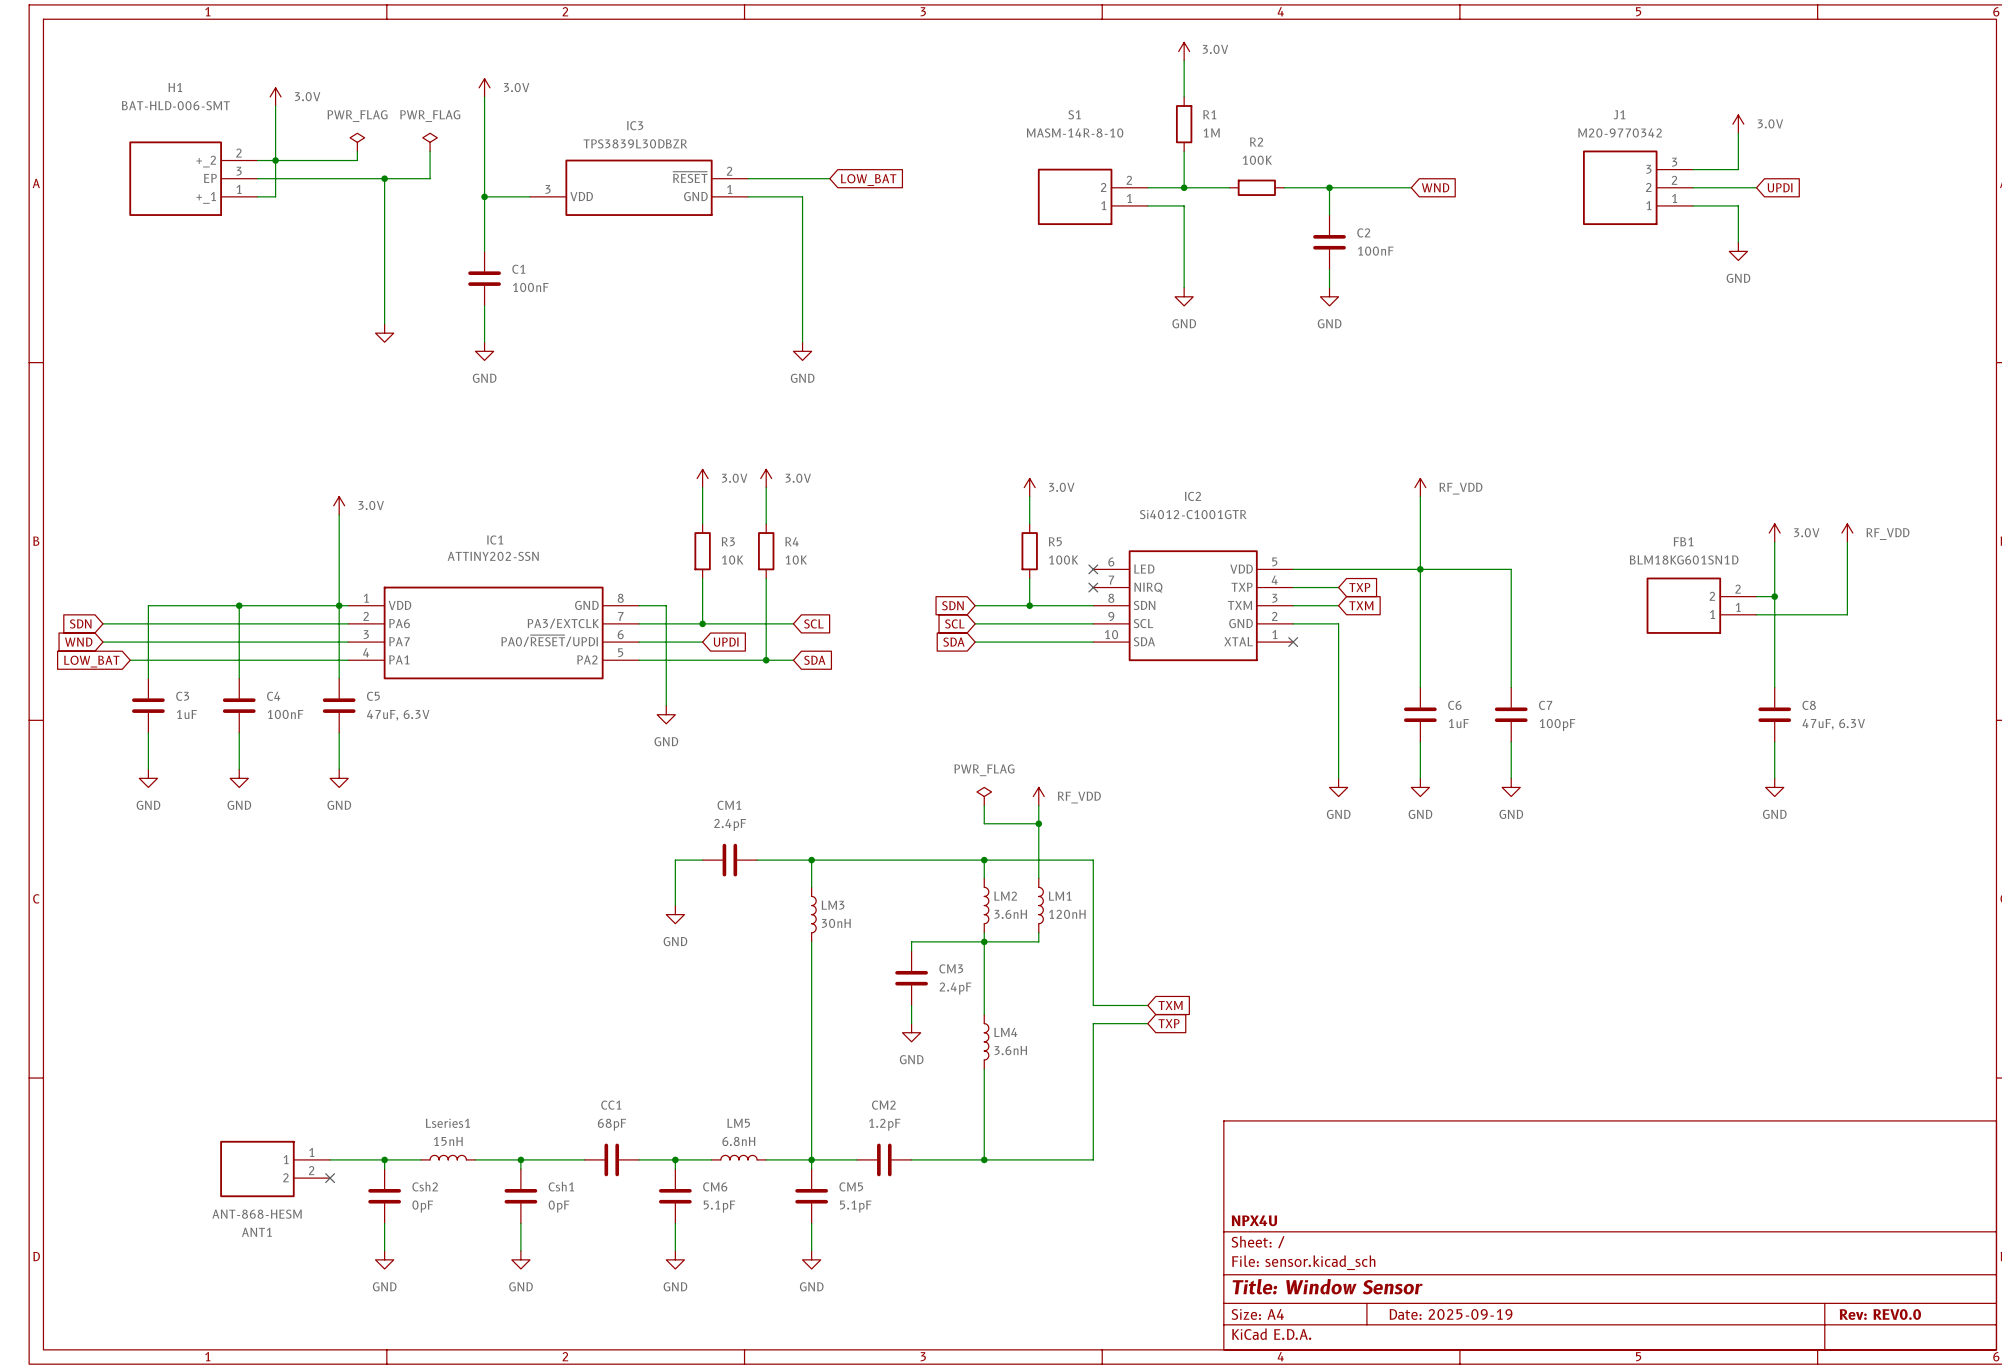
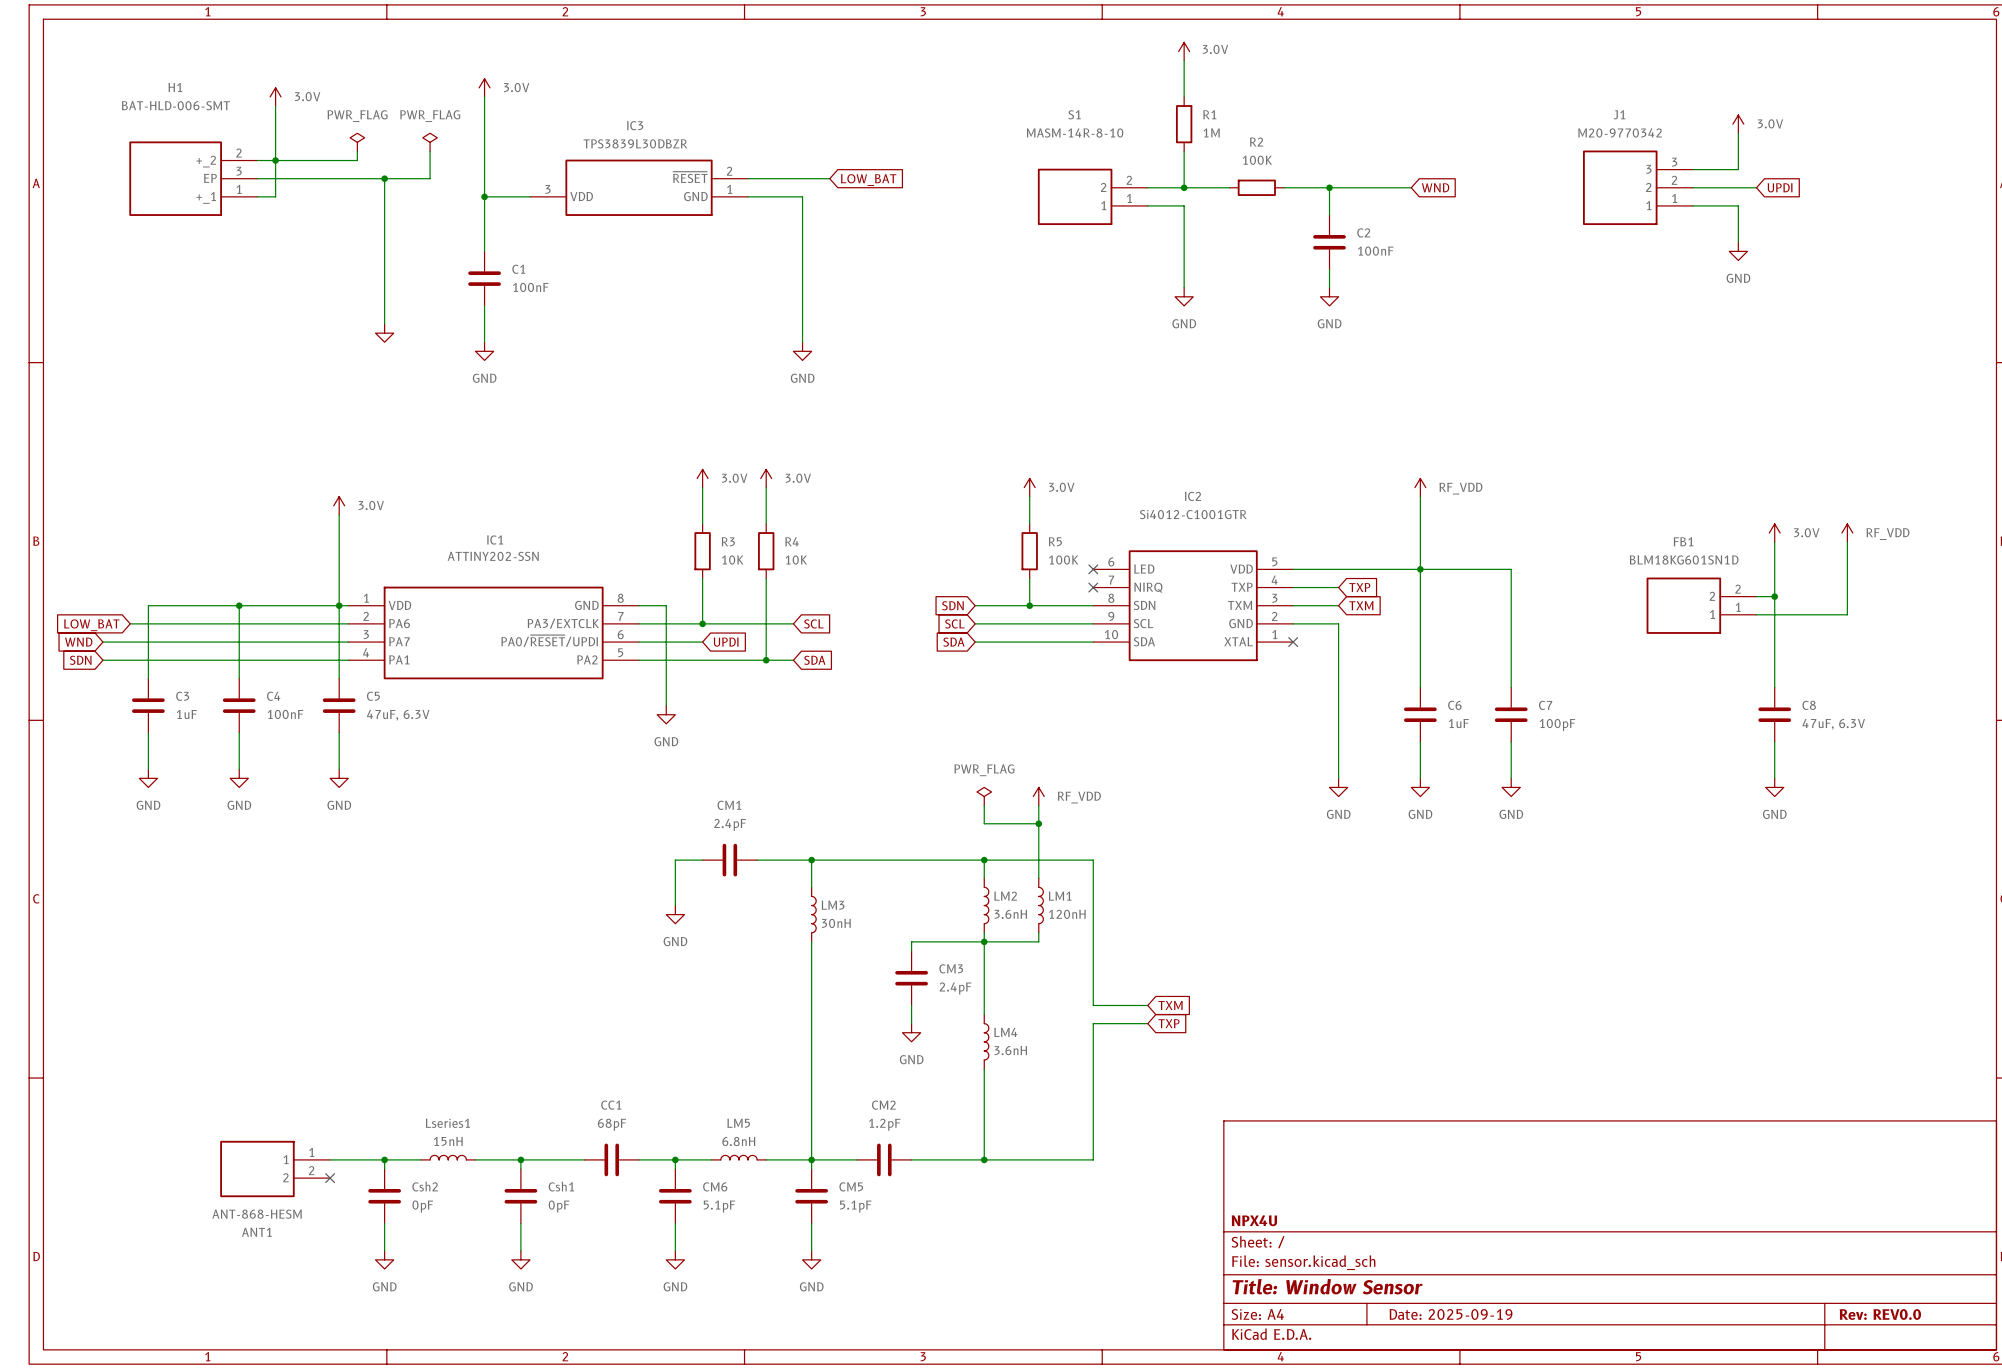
global label position: SDN (80, 623) -> SDN (80, 660)
wire: (102, 623) (130, 623) -> (102, 660) (130, 660)
global label position: LOW_BAT (91, 661) -> LOW_BAT (91, 625)

